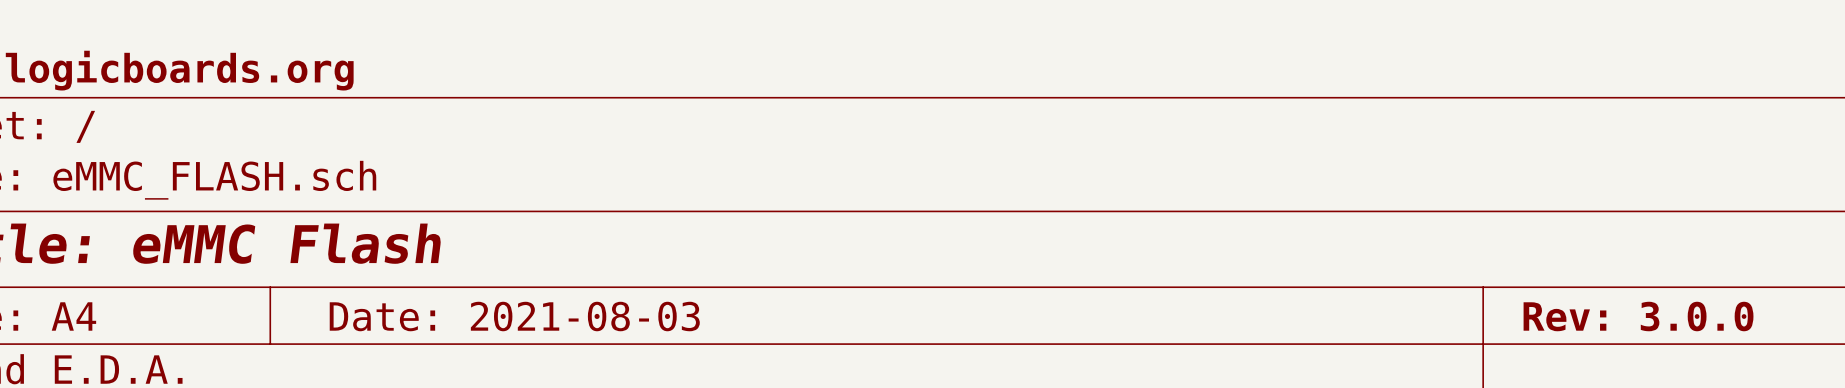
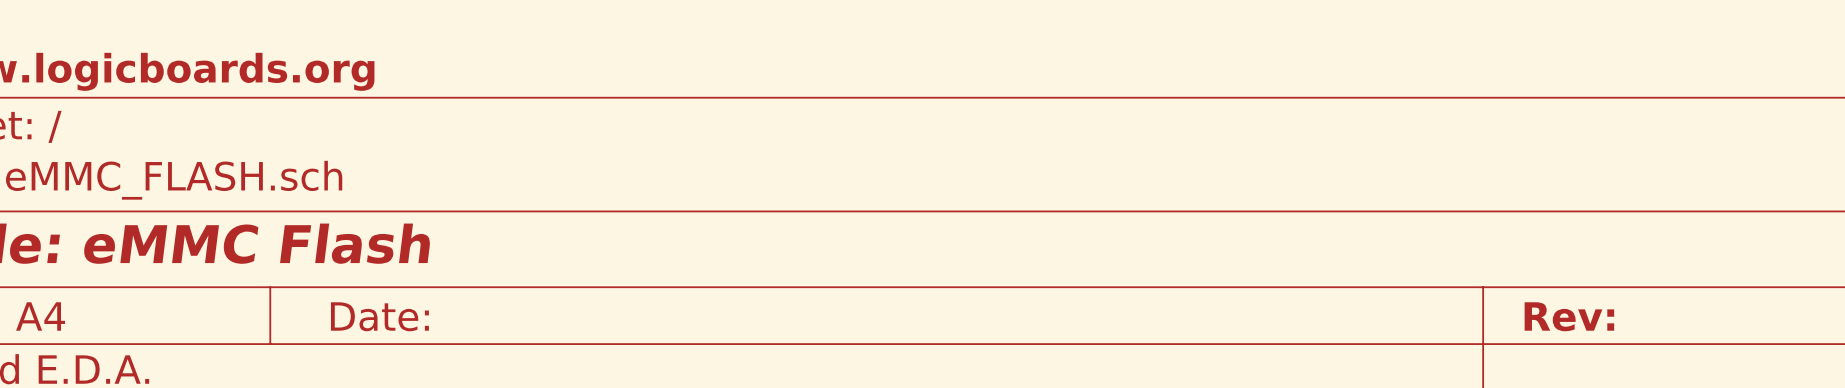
title block: Date: 2021-08-03 (514, 316) -> Date: (379, 316)
title block: Rev: 3.0.0 (1638, 316) -> Rev: (1569, 316)

